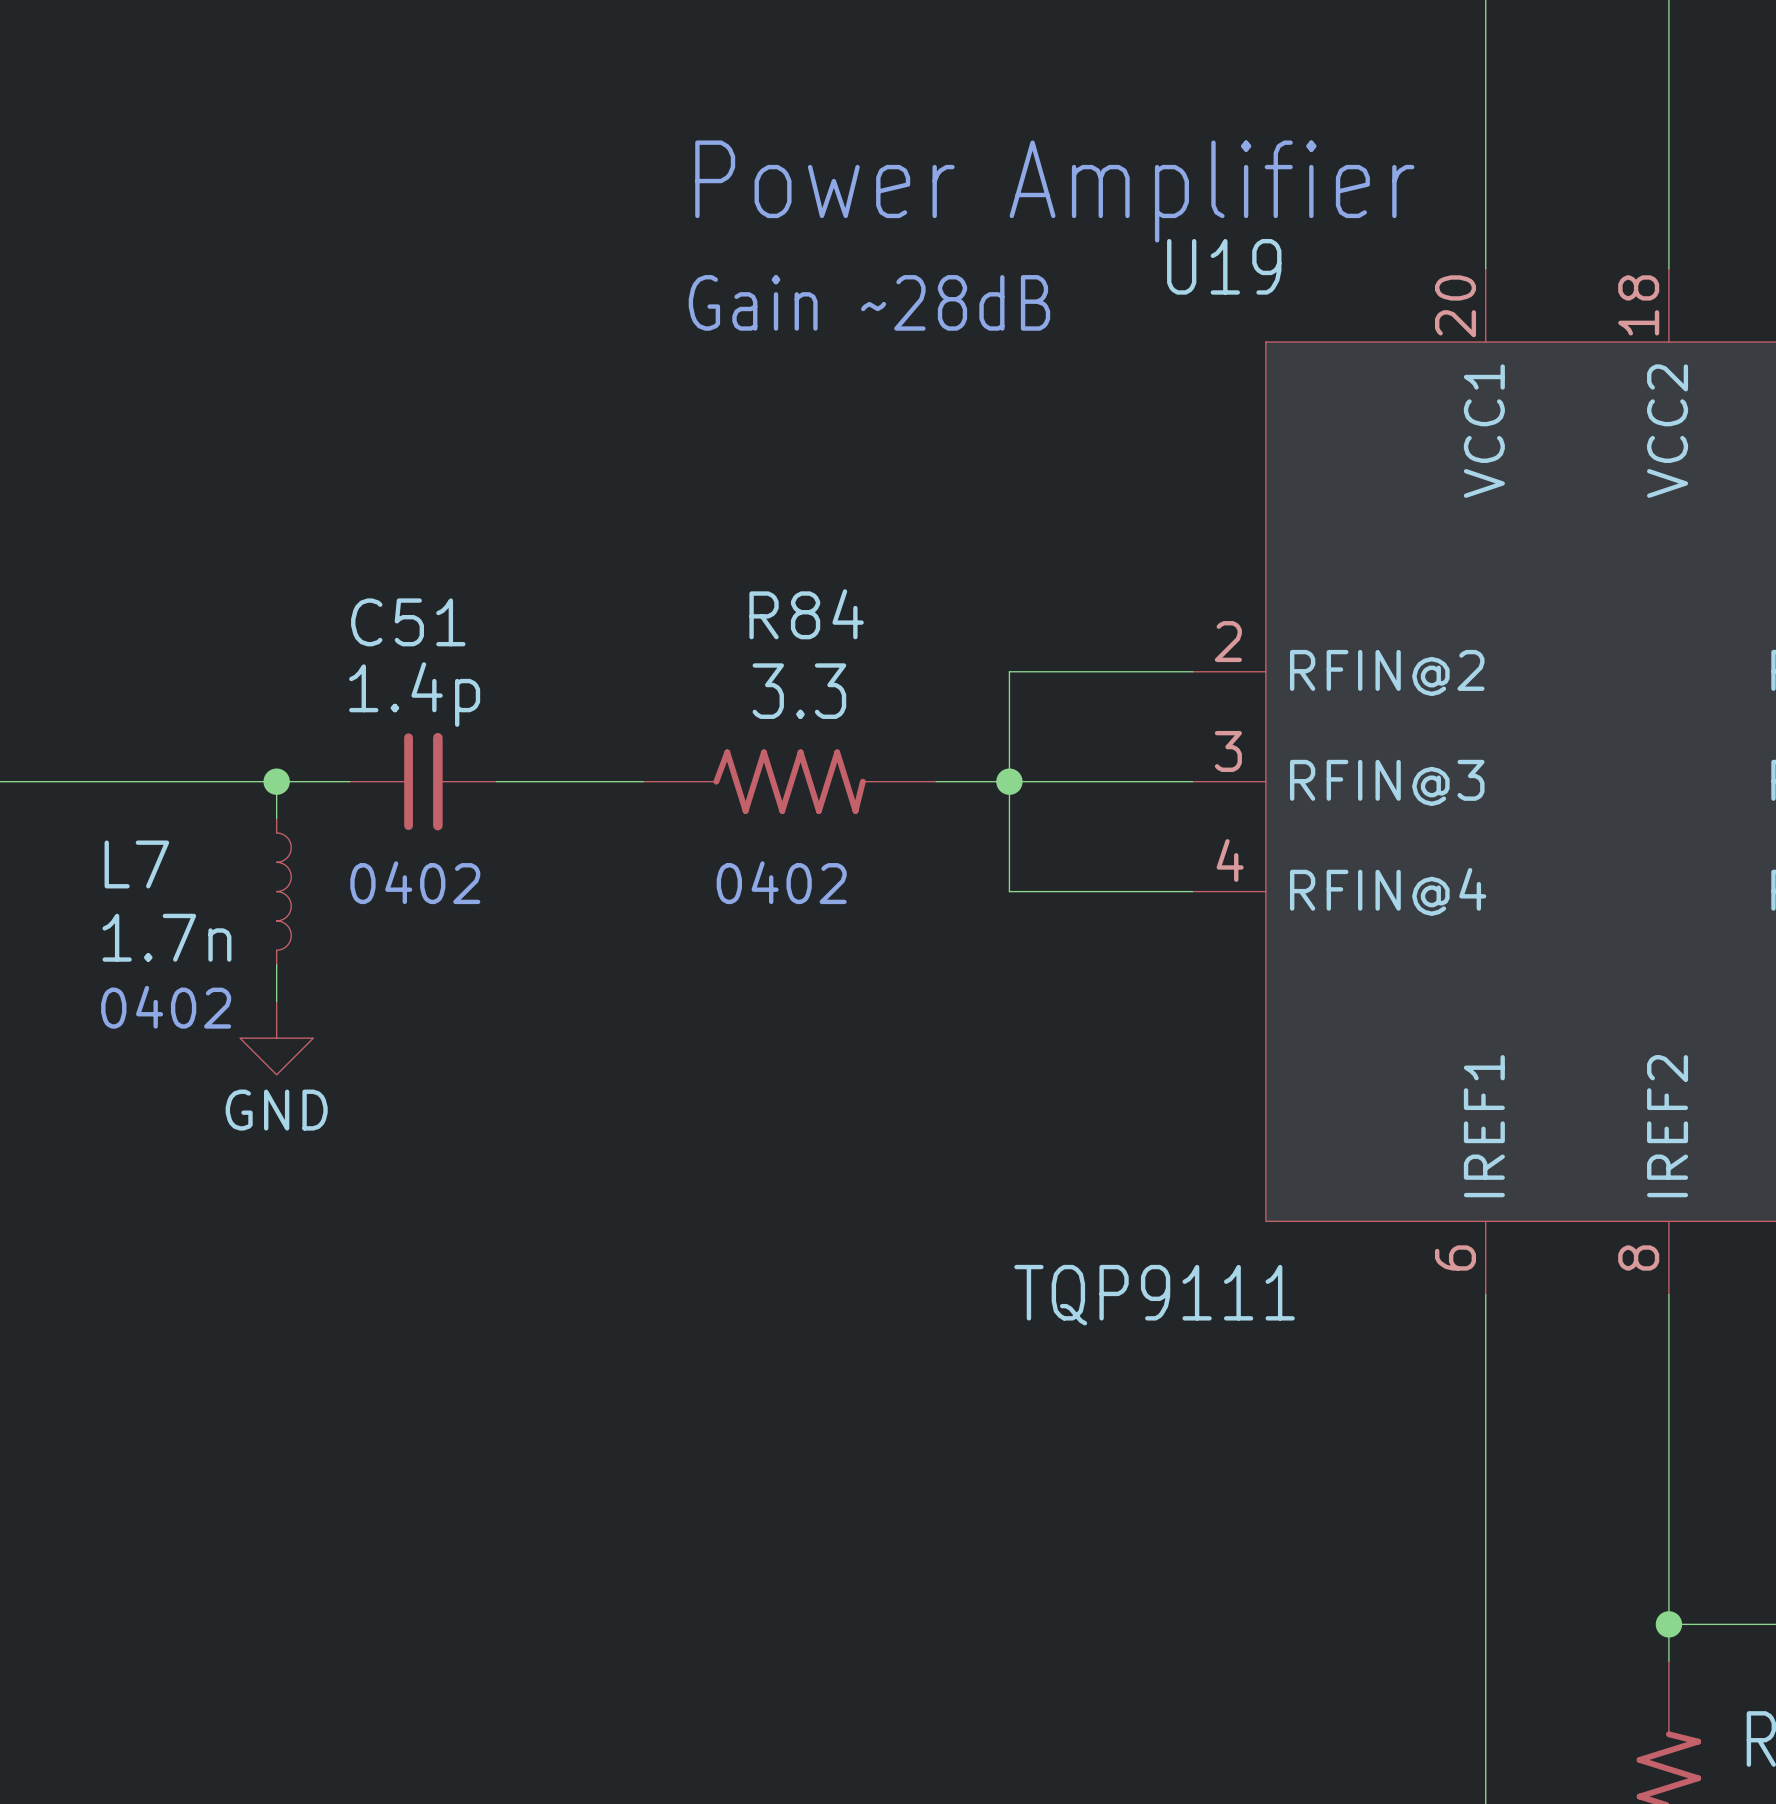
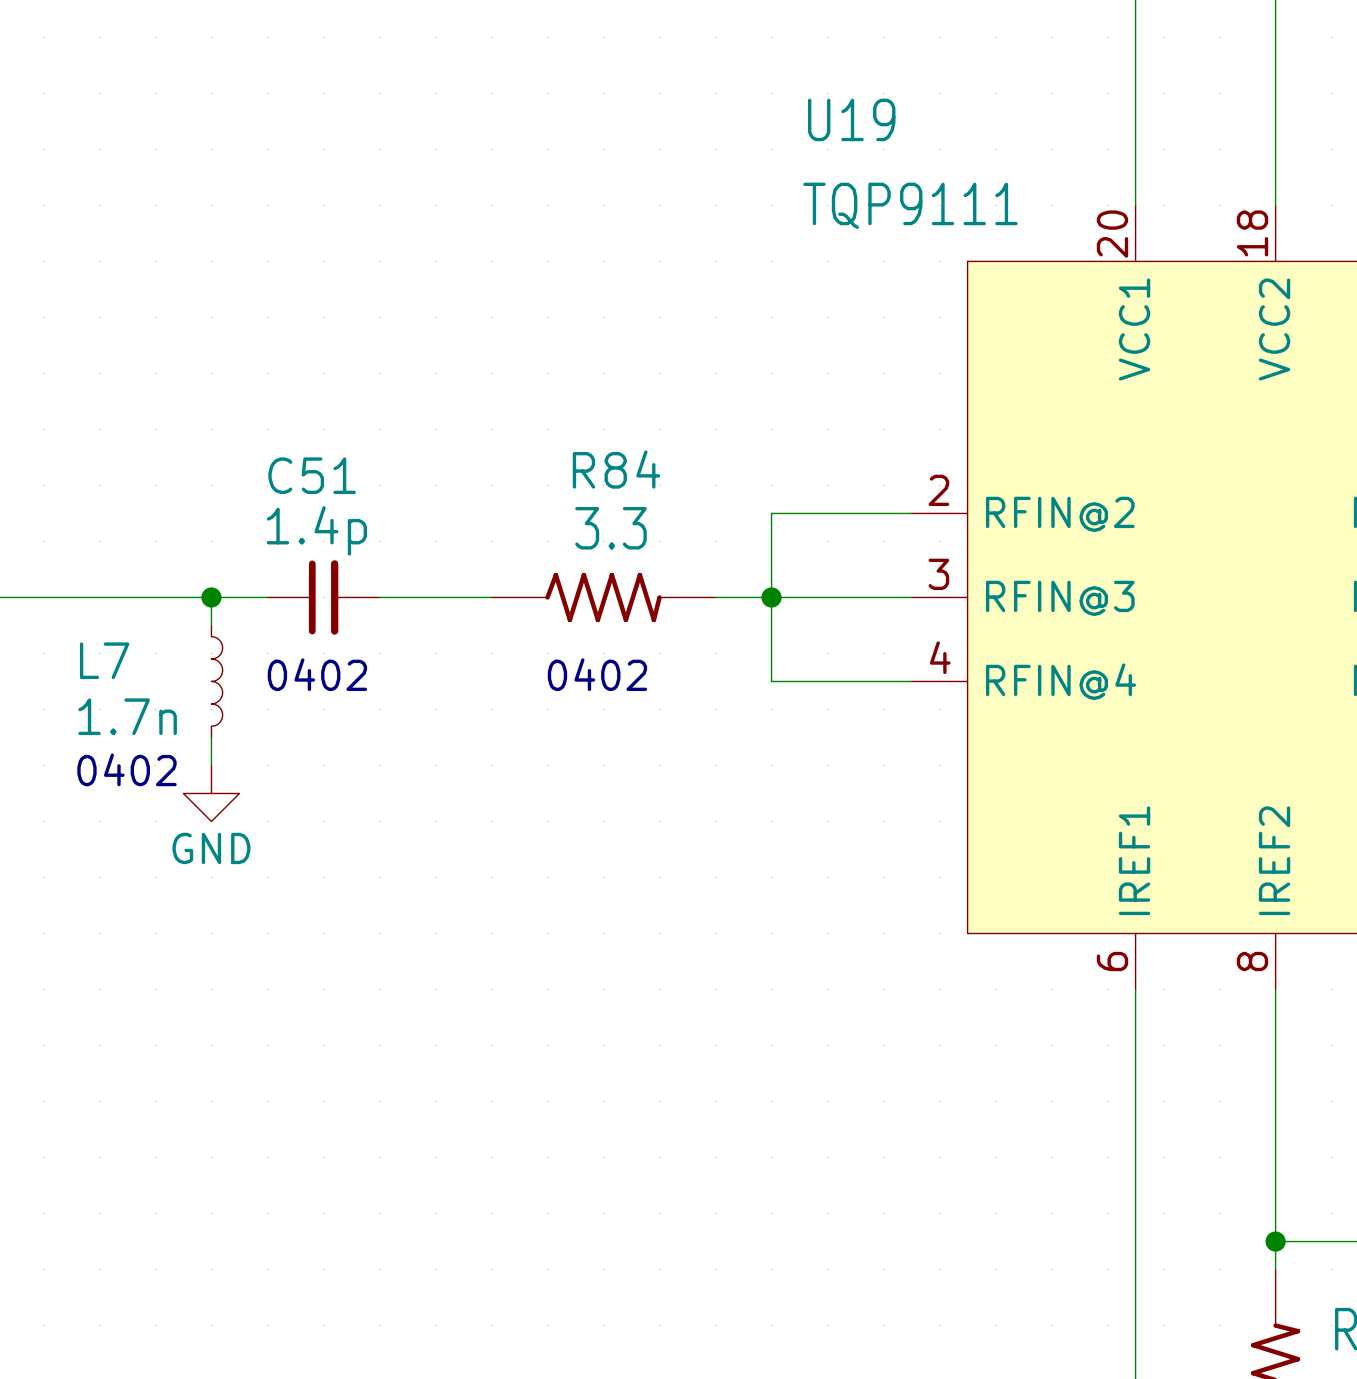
text: Power Amplifier (1054, 191) -> none
U19 name position: U19 (1224, 266) -> U19 (851, 119)
text: Gain ~28dB (869, 302) -> none
U19 value position: TQP9111 (1154, 1295) -> TQP9111 (910, 205)

